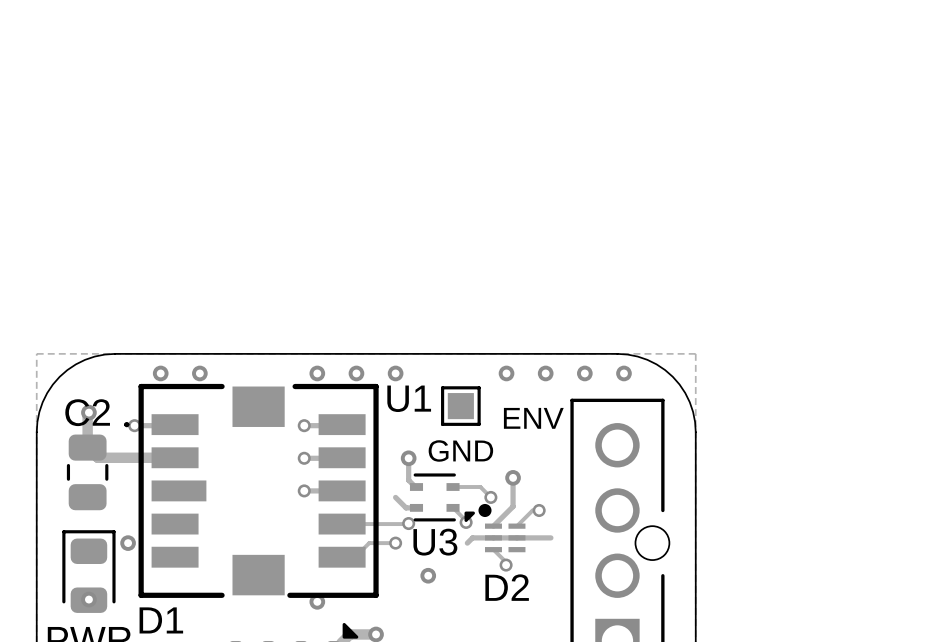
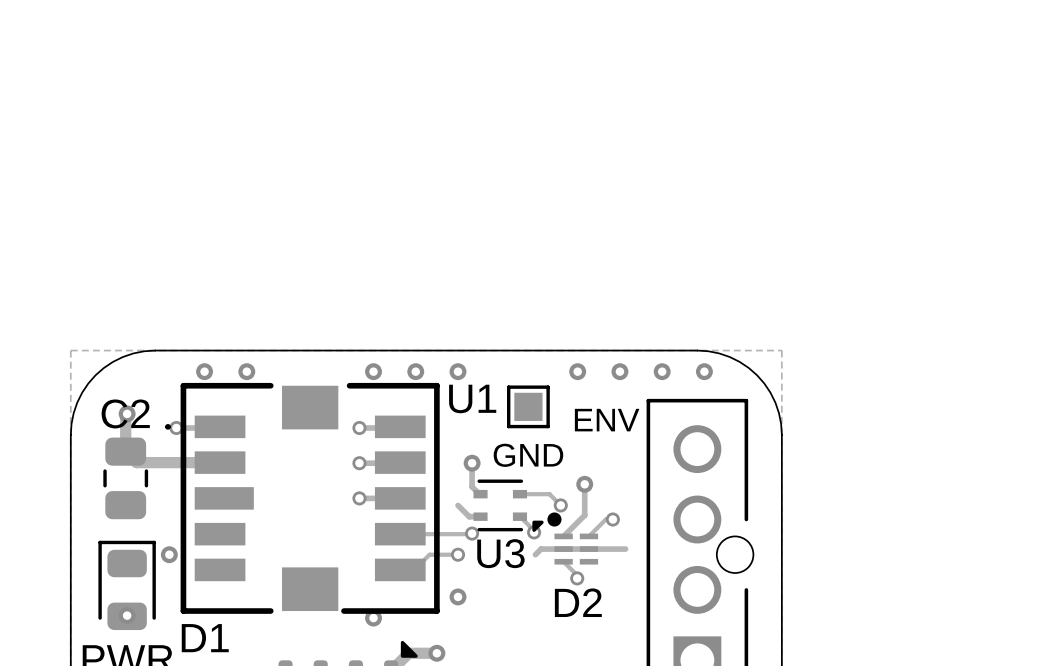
via position: (428, 575) -> (458, 596)

